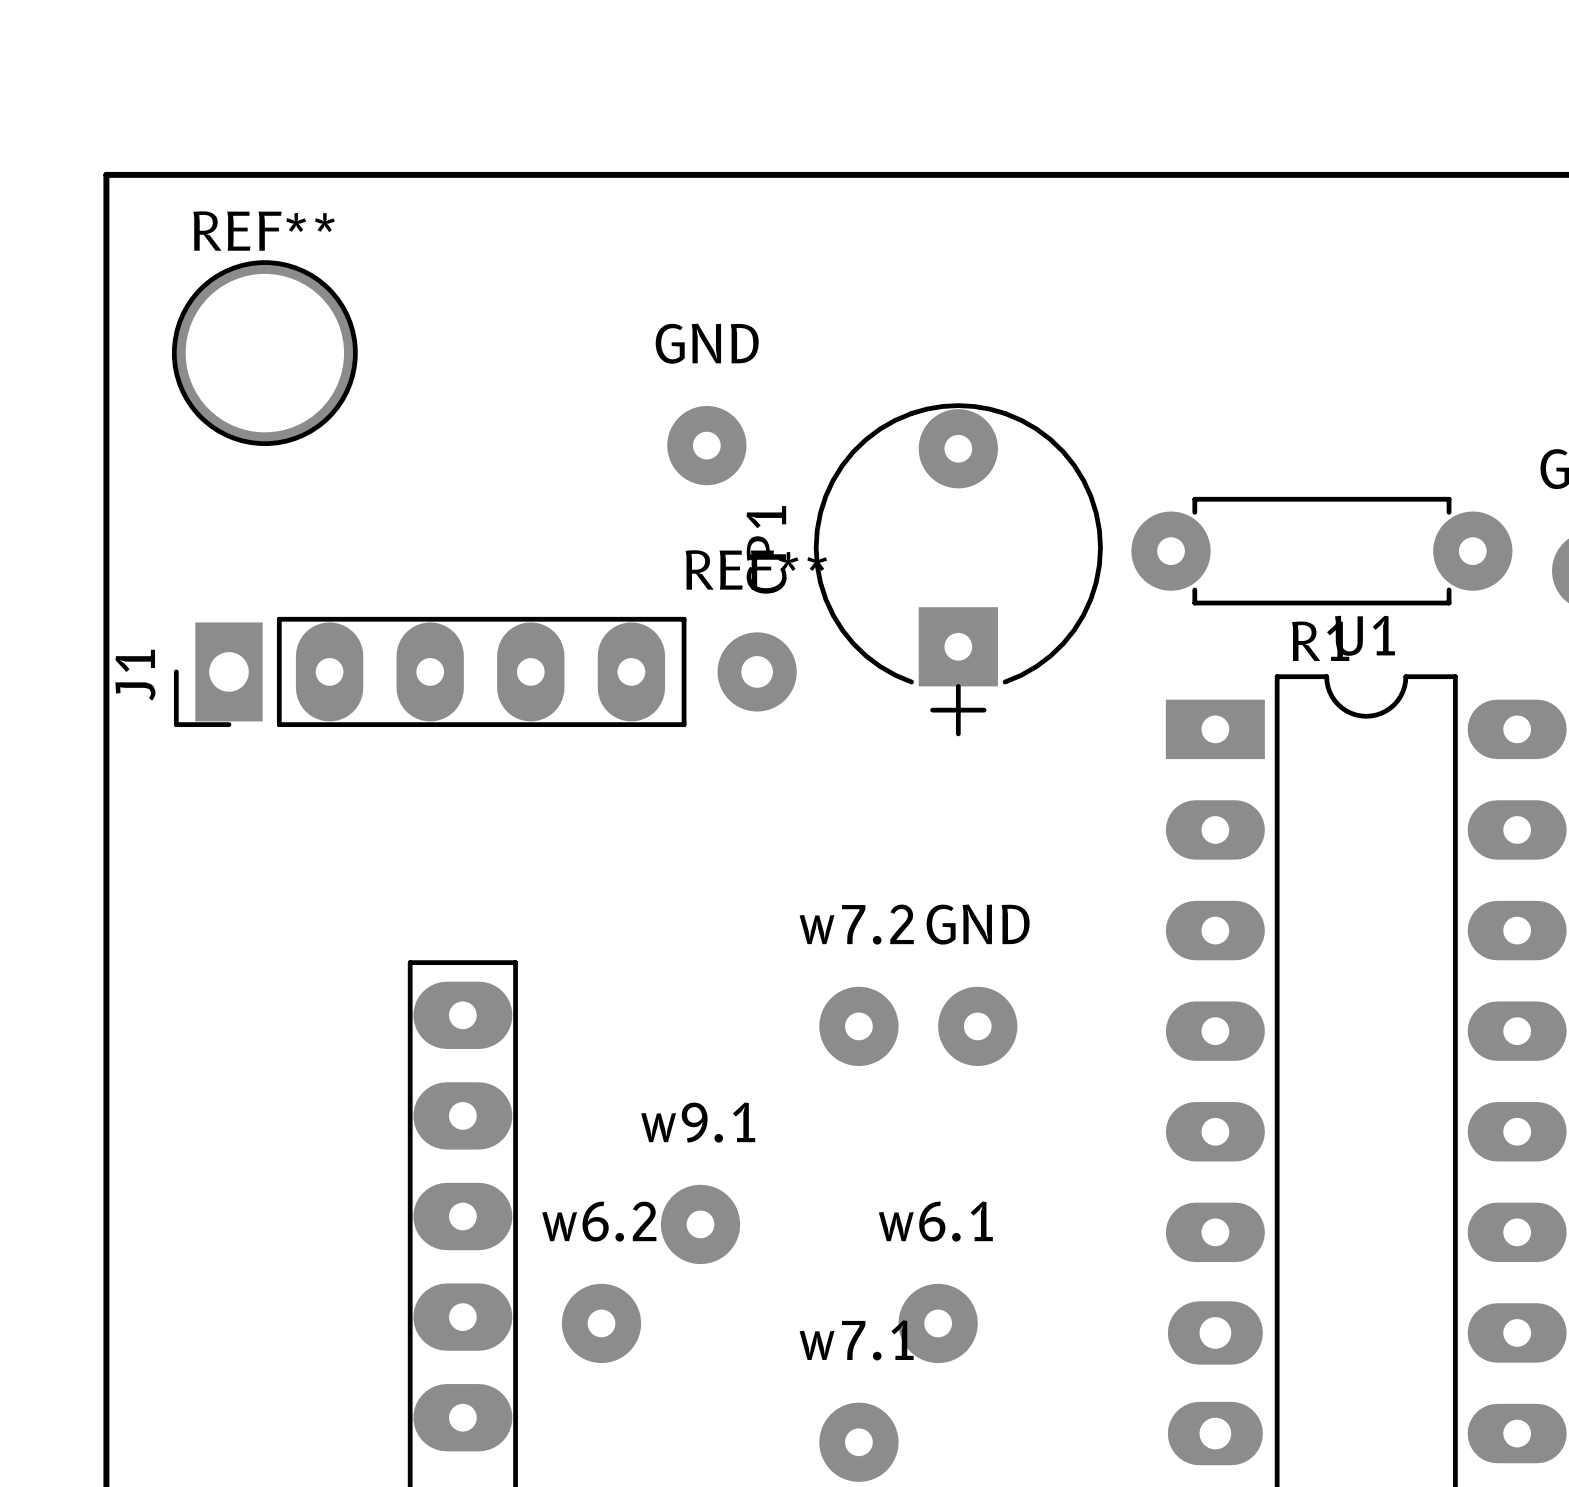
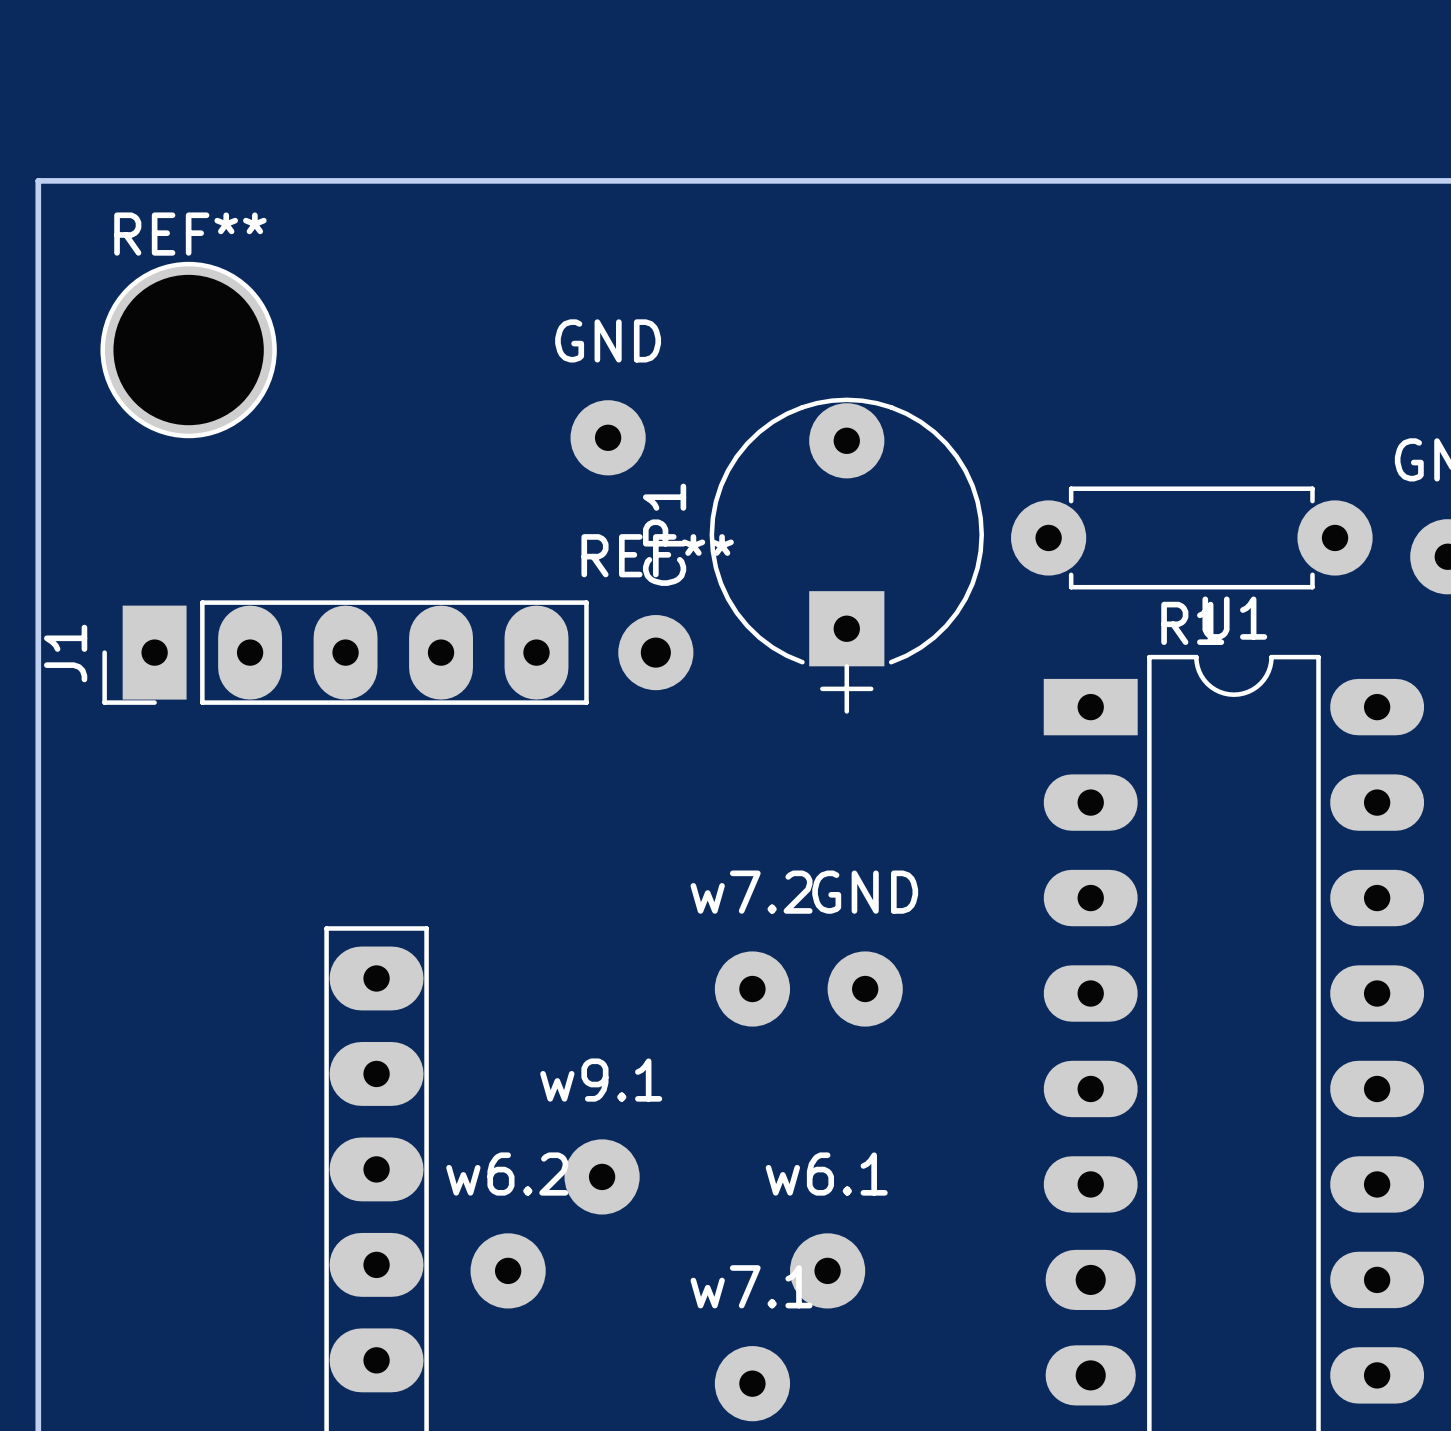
J1 footprint: [173, 616, 687, 727] -> [102, 600, 589, 705]

